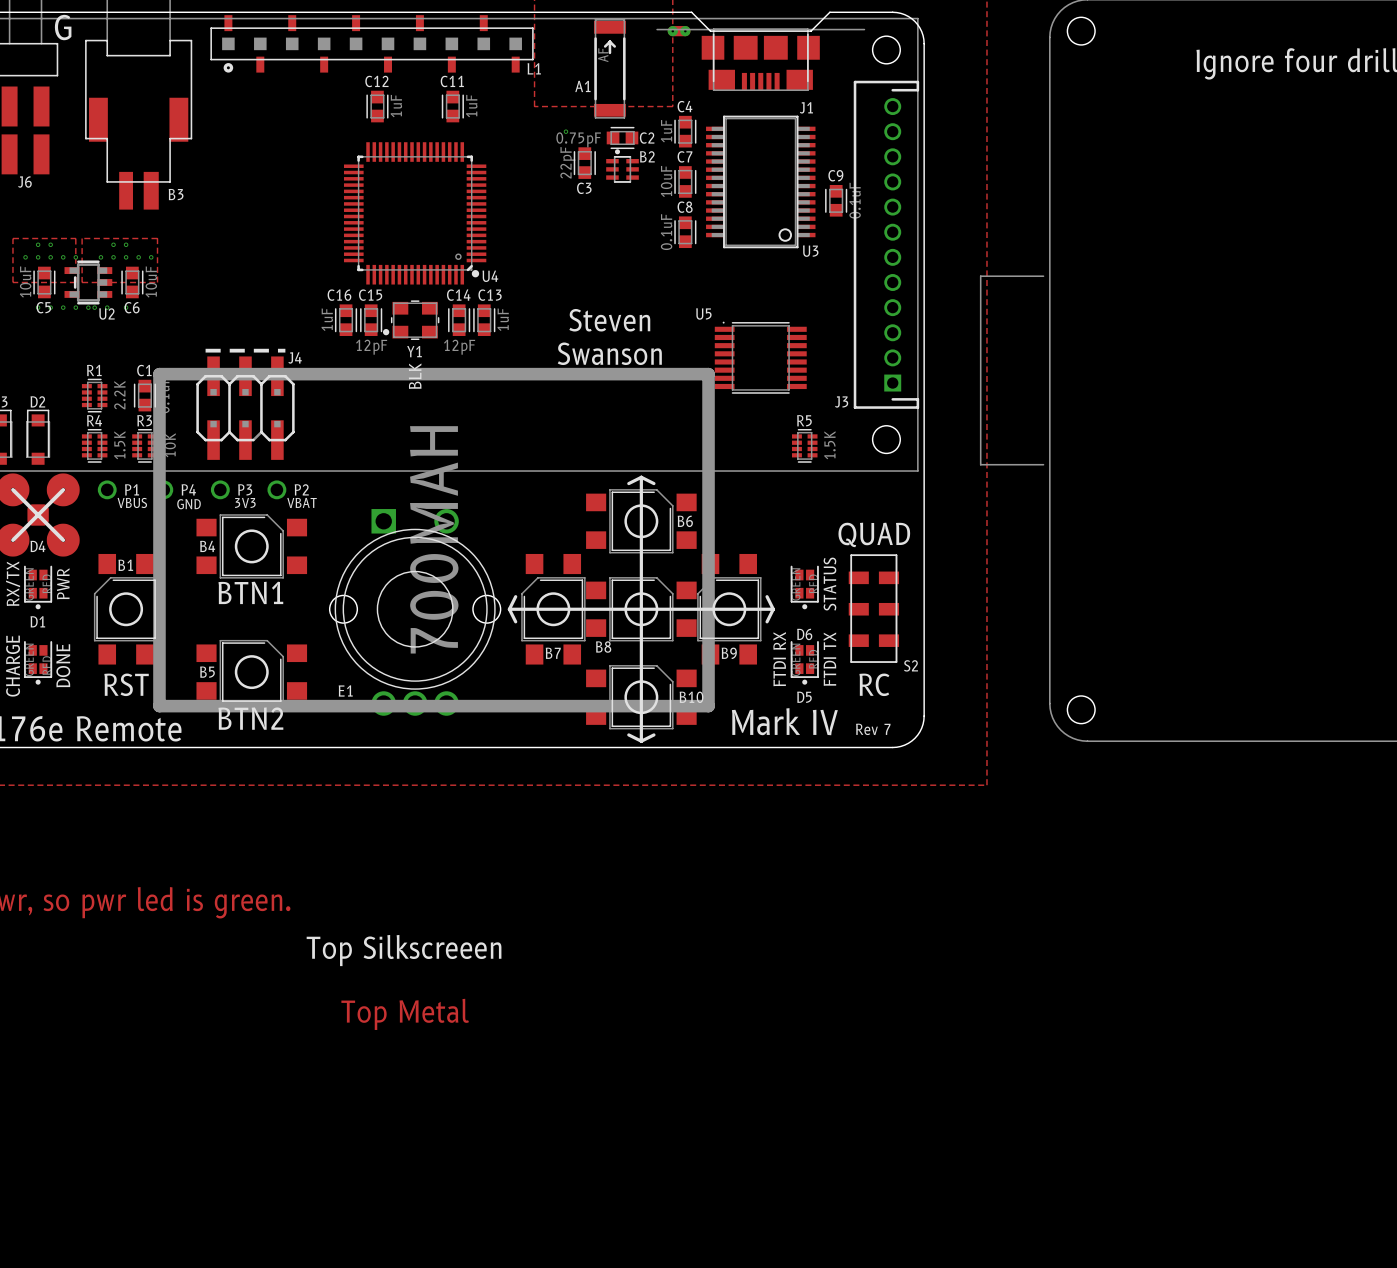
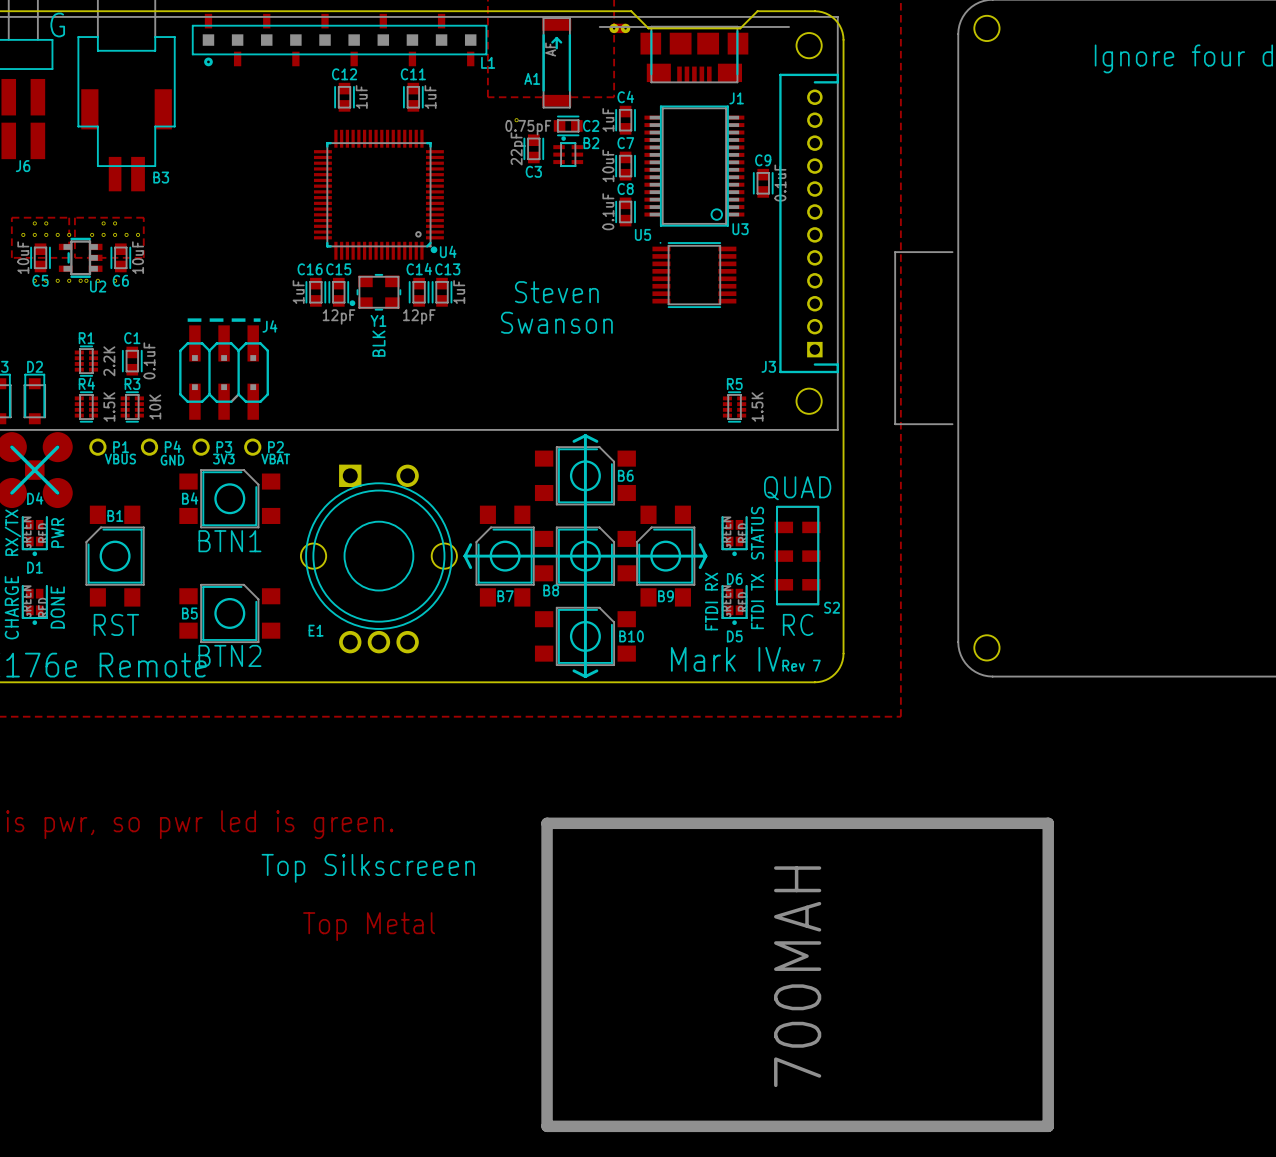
U5 position: (760, 357) -> (694, 274)
drawing: [153, 367, 715, 713] -> none
drawing: none -> [541, 817, 1054, 1133]

